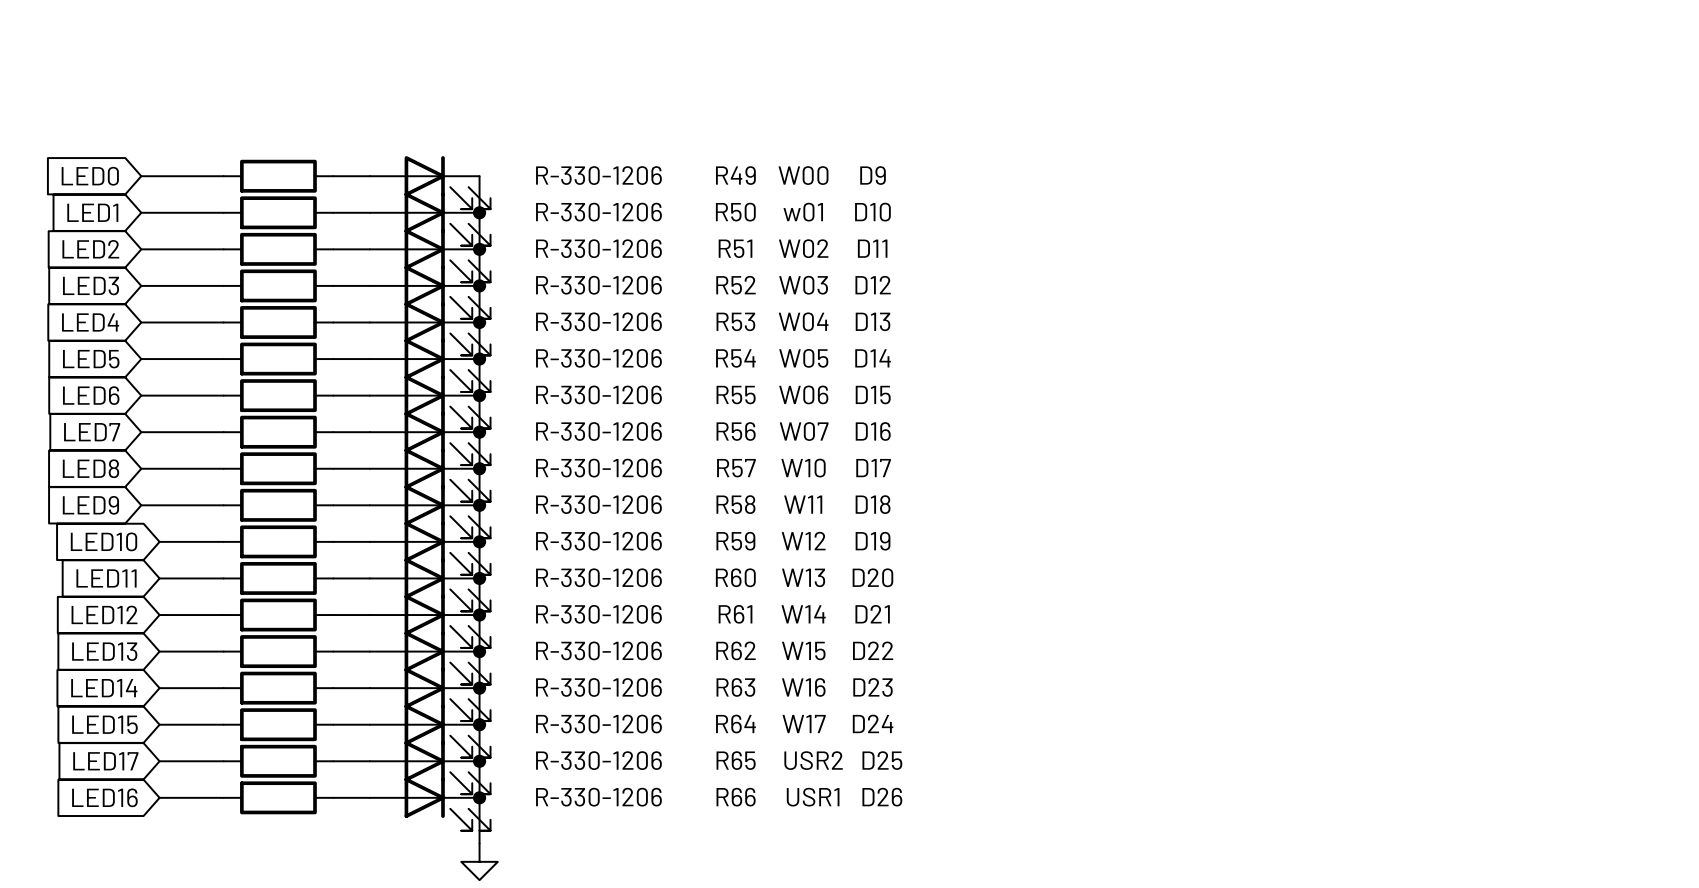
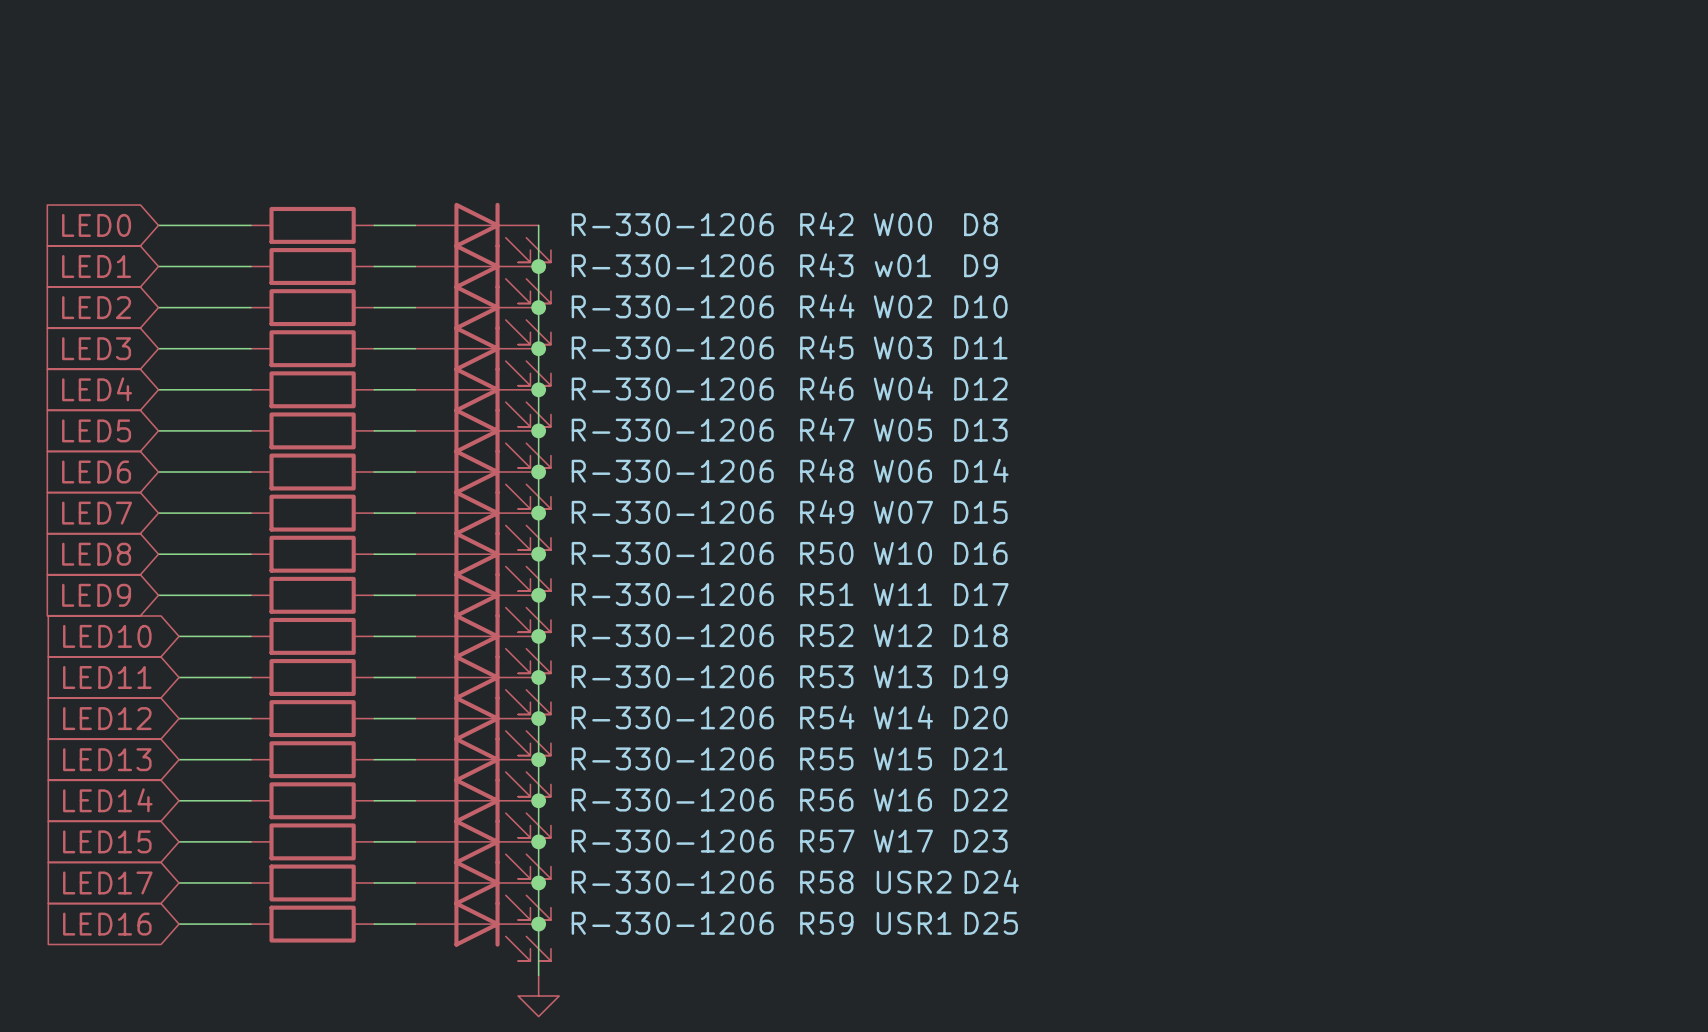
R49 name: R49 (735, 175) -> R42 (826, 224)
D9 name: D9 (873, 175) -> D8 (980, 224)
R50 name: R50 (735, 212) -> R43 (826, 265)
D10 name: D10 (872, 212) -> D9 (980, 265)
R51 name: R51 (735, 248) -> R44 (827, 306)
D11 name: D11 (872, 248) -> D10 (980, 306)
R52 name: R52 (735, 285) -> R45 (826, 347)
D12 name: D12 (873, 285) -> D11 (980, 347)
R53 name: R53 (735, 321) -> R46 (826, 388)
D13 name: D13 (873, 321) -> D12 (980, 389)
R54 name: R54 (735, 358) -> R47 (827, 429)
D14 name: D14 (873, 358) -> D13 (980, 430)
R55 name: R55 (736, 395) -> R48 (826, 470)
D15 name: D15 (873, 395) -> D14 (981, 470)
R56 name: R56 (736, 431) -> R49 (826, 511)
D16 name: D16 (873, 431) -> D15 (980, 512)
R57 name: R57 (736, 468) -> R50 (826, 553)
D17 name: D17 (873, 468) -> D16 (980, 553)
R58 name: R58 (735, 504) -> R51 (826, 594)
D18 name: D18 (873, 504) -> D17 (981, 594)
R59 name: R59 (735, 541) -> R52 (826, 635)
D19 name: D19 (873, 541) -> D18 (980, 635)
R60 name: R60 (735, 577) -> R53 (826, 676)
D20 name: D20 (872, 577) -> D19 (980, 676)
R61 name: R61 (735, 614) -> R54 (827, 717)
D21 name: D21 (872, 614) -> D20 (980, 717)
R62 name: R62 (735, 650) -> R55 (826, 758)
D22 name: D22 (873, 650) -> D21 (980, 758)
R63 name: R63 (735, 687) -> R56 (826, 800)
D23 name: D23 (873, 687) -> D22 (980, 800)
D24 name: D24 (873, 723) -> D23 (980, 841)
R64 name: R64 (735, 724) -> R57 (827, 841)
R65 name: R65 (736, 760) -> R58 (826, 882)
D25 name: D25 (882, 760) -> D24 (991, 881)
R66 name: R66 (736, 797) -> R59 (826, 923)
D26 name: D26 (882, 797) -> D25 (991, 923)

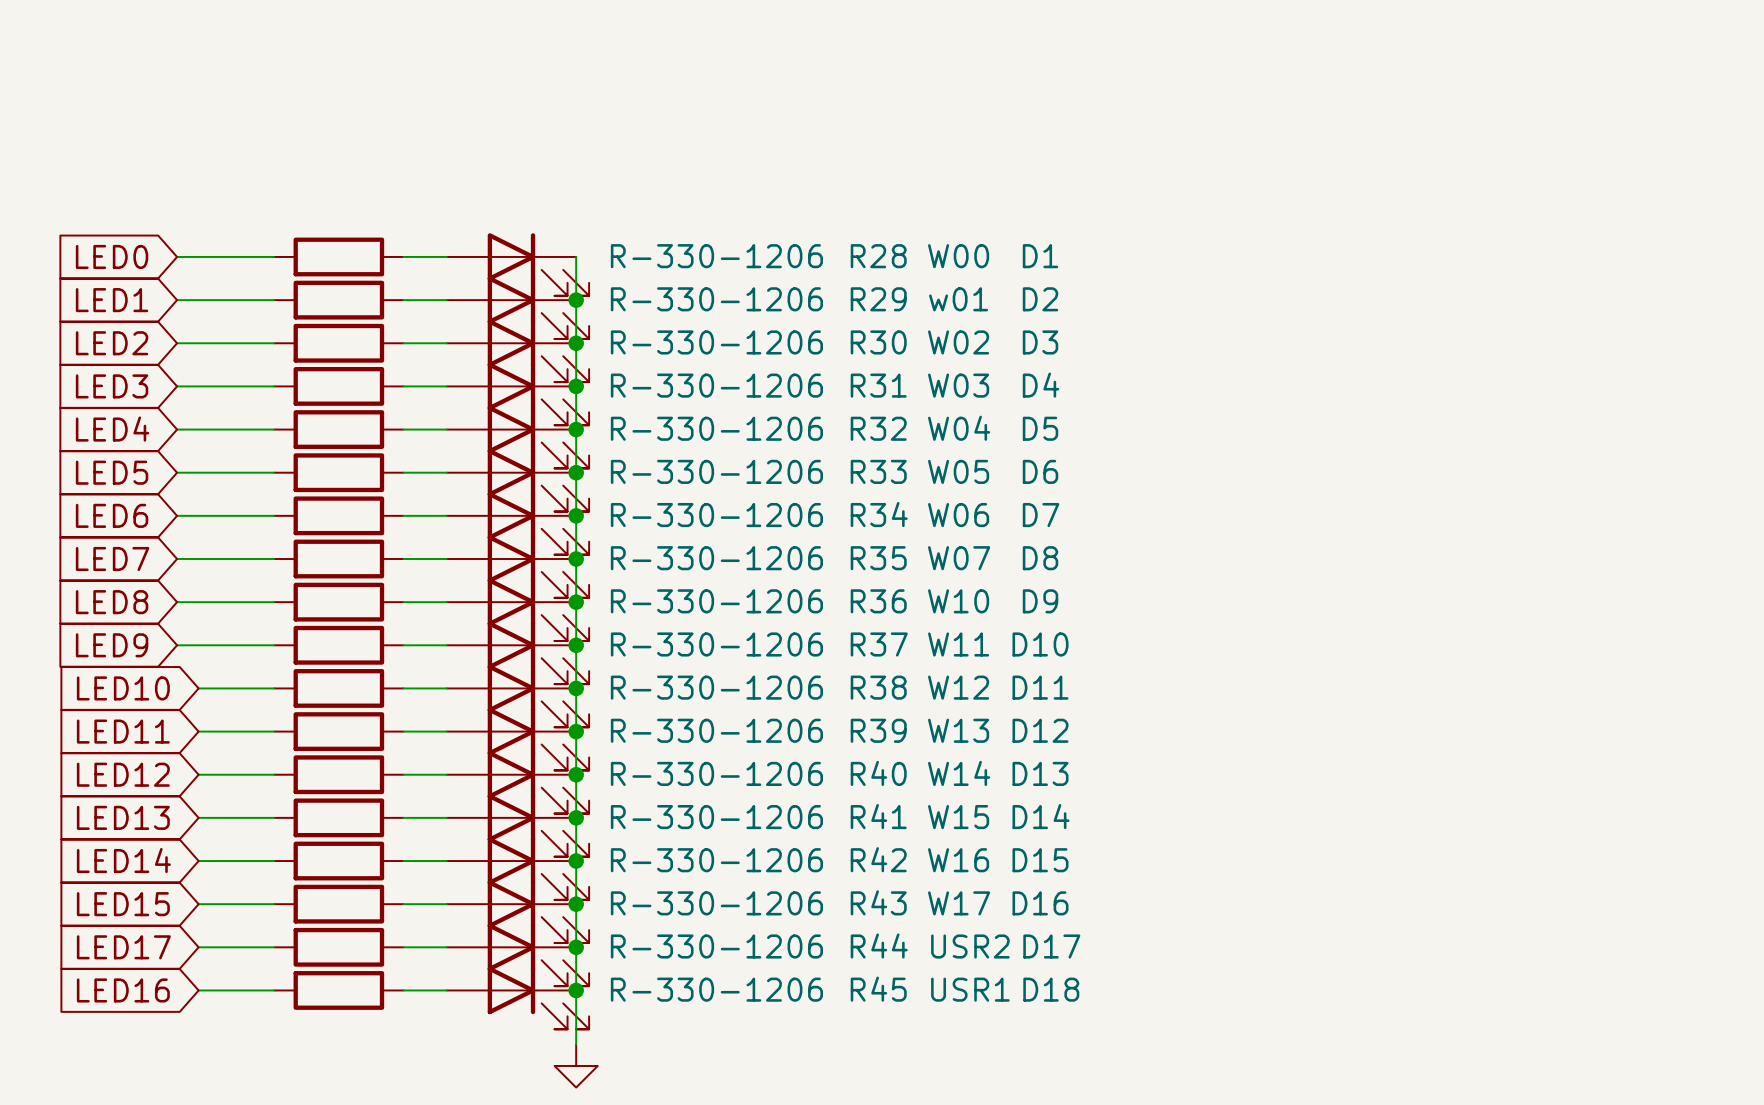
R42 name: R42 (826, 224) -> R28 (878, 256)
D8 name: D8 (980, 224) -> D1 (1040, 256)
R43 name: R43 (826, 265) -> R29 (878, 299)
D9 name: D9 (980, 265) -> D2 (1040, 299)
R44 name: R44 (827, 306) -> R30 (878, 342)
D10 name: D10 (980, 306) -> D3 (1040, 342)
R45 name: R45 (826, 347) -> R31 (878, 385)
D11 name: D11 (980, 347) -> D4 (1041, 385)
R46 name: R46 (826, 388) -> R32 (878, 428)
D12 name: D12 (980, 389) -> D5 (1040, 428)
R47 name: R47 (827, 429) -> R33 (878, 471)
D13 name: D13 (980, 430) -> D6 (1040, 471)
R48 name: R48 (826, 470) -> R34 (879, 514)
D14 name: D14 (981, 470) -> D7 (1041, 515)
R49 name: R49 (826, 511) -> R35 (878, 558)
D15 name: D15 (980, 512) -> D8 (1040, 558)
R50 name: R50 (826, 553) -> R36 (878, 601)
D16 name: D16 (980, 553) -> D9 (1040, 601)
R51 name: R51 (826, 594) -> R37 (879, 644)
D17 name: D17 (981, 594) -> D10 (1040, 644)
R52 name: R52 (826, 635) -> R38 (878, 687)
D18 name: D18 (980, 635) -> D11 (1040, 687)
R53 name: R53 (826, 676) -> R39 (878, 730)
D19 name: D19 (980, 676) -> D12 (1040, 730)
R54 name: R54 (827, 717) -> R40 (878, 773)
D20 name: D20 (980, 717) -> D13 (1040, 773)
R55 name: R55 (826, 758) -> R41 (878, 816)
D21 name: D21 (980, 758) -> D14 (1041, 816)
R56 name: R56 (826, 800) -> R42 (878, 859)
D22 name: D22 (980, 800) -> D15 (1040, 860)
R57 name: R57 (827, 841) -> R43 (878, 902)
D23 name: D23 (980, 841) -> D16 (1040, 903)
D24 name: D24 (991, 881) -> D17 (1051, 946)
R58 name: R58 (826, 882) -> R44 (879, 945)
R59 name: R59 (826, 923) -> R45 (878, 989)
D25 name: D25 (991, 923) -> D18 (1051, 989)

